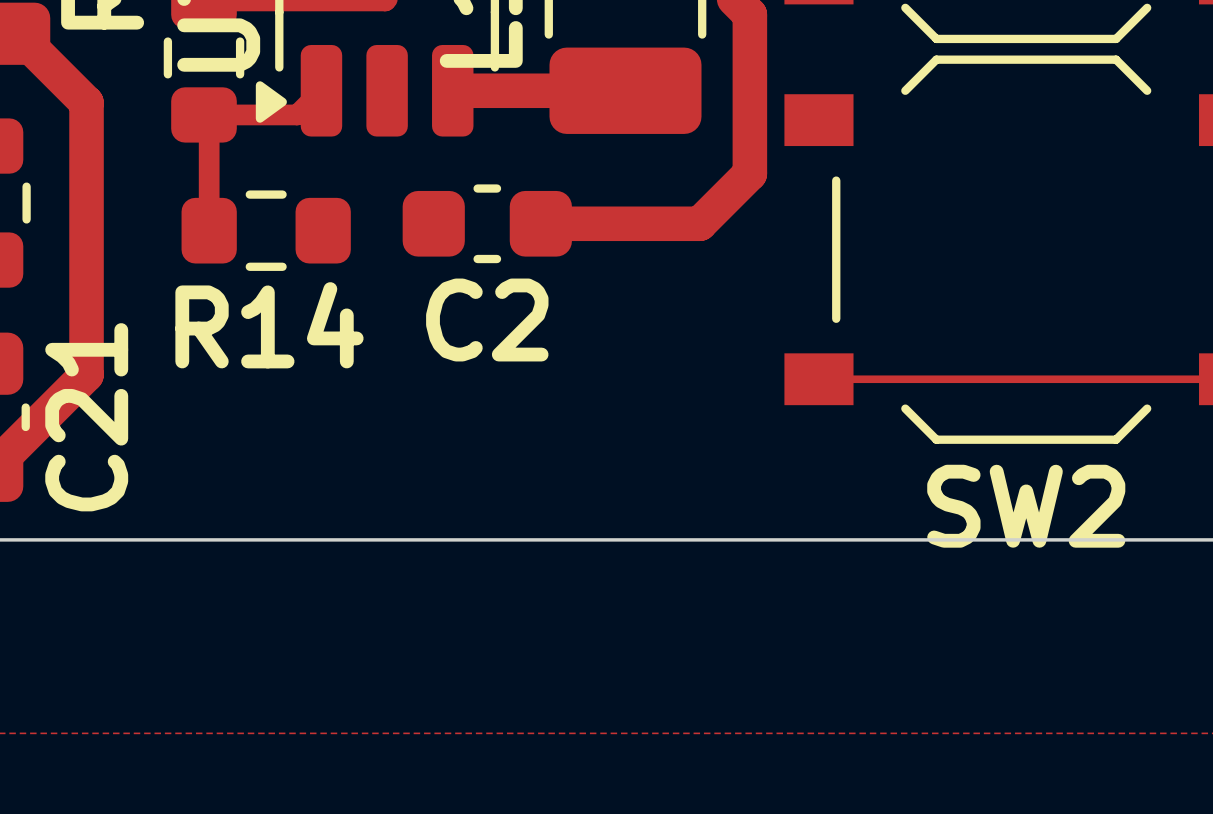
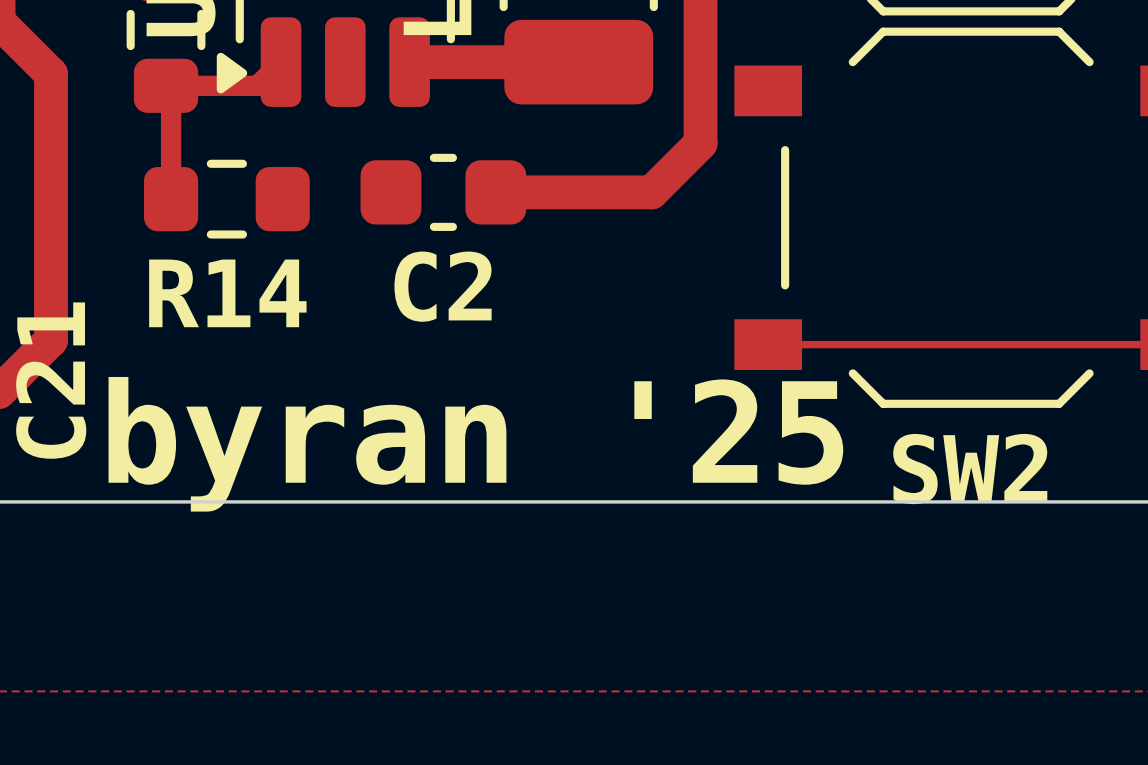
text: none -> byran '25 (475, 444)

